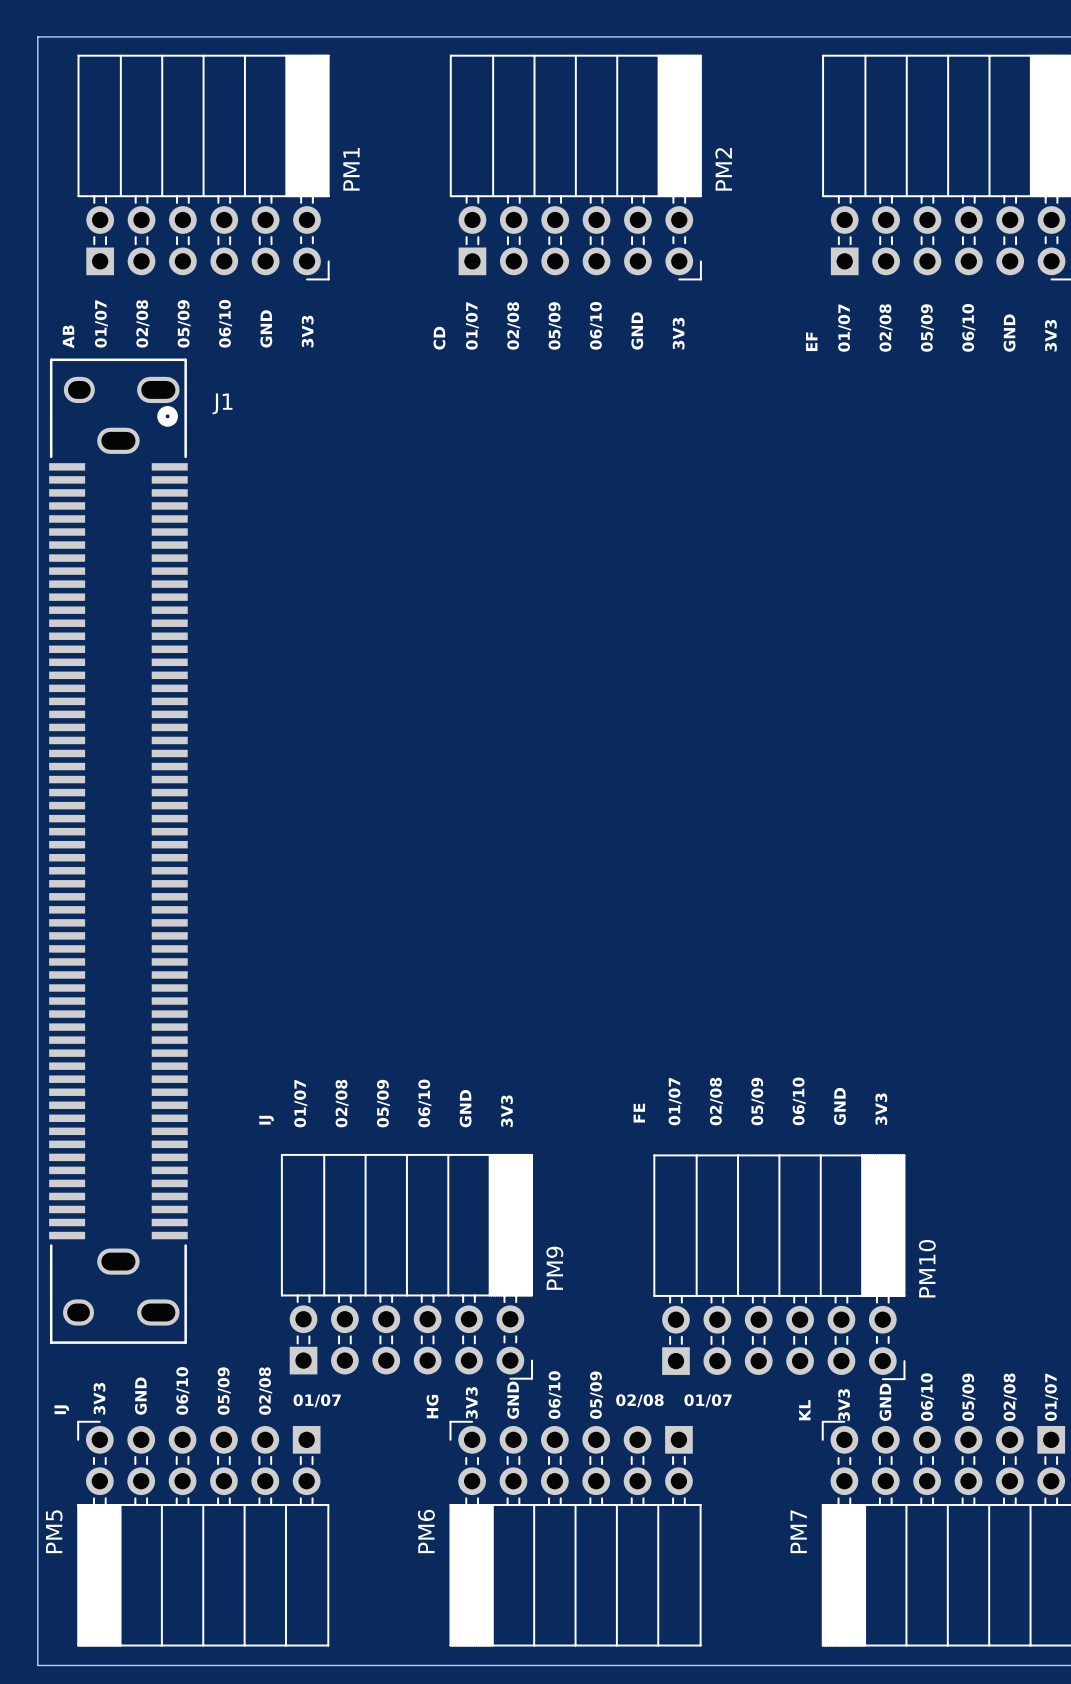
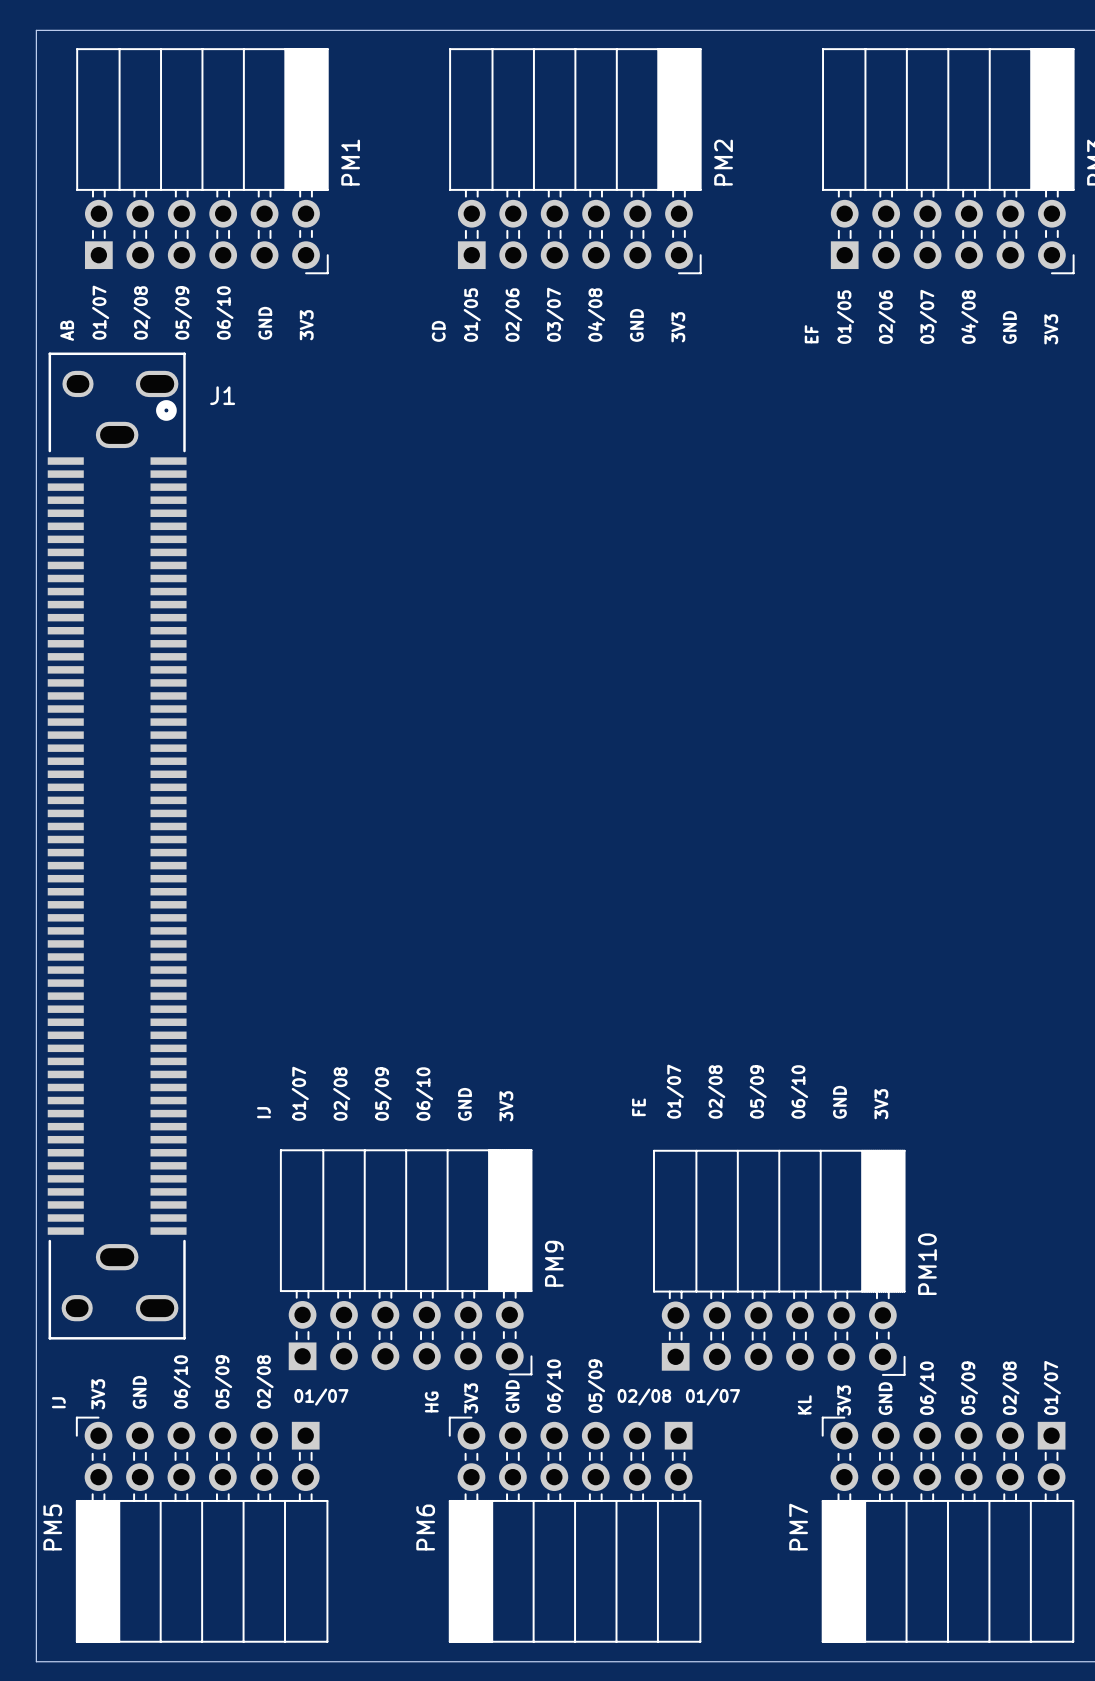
text: 02/08 (513, 325) -> 02/06 (513, 315)
text: 05/09 (555, 325) -> 03/07 (555, 314)
text: 06/10 (596, 325) -> 04/08 (596, 315)
text: 01/07 (472, 326) -> 01/05 (472, 315)
text: 02/08 (886, 327) -> 02/06 (886, 317)
text: 06/10 (968, 327) -> 04/08 (969, 317)
text: 01/07 (844, 328) -> 01/05 (845, 317)
text: 05/09 (927, 328) -> 03/07 (928, 316)

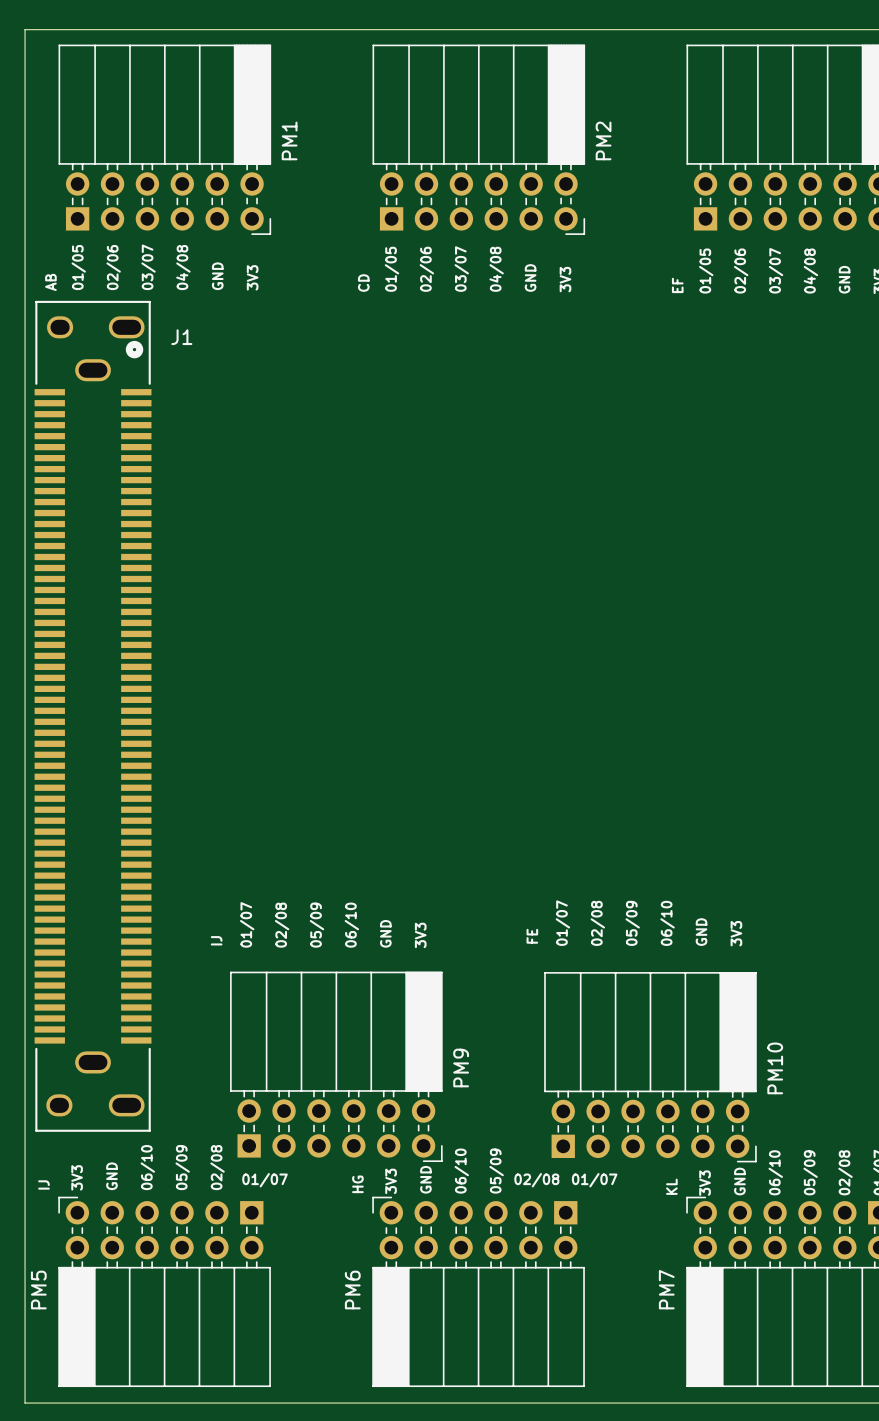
text: 01/07 (100, 312) -> 01/05 (78, 267)
text: 02/08 (142, 312) -> 02/06 (113, 267)
text: 05/09 (183, 312) -> 03/07 (148, 267)
text: 06/10 (224, 312) -> 04/08 (183, 267)

